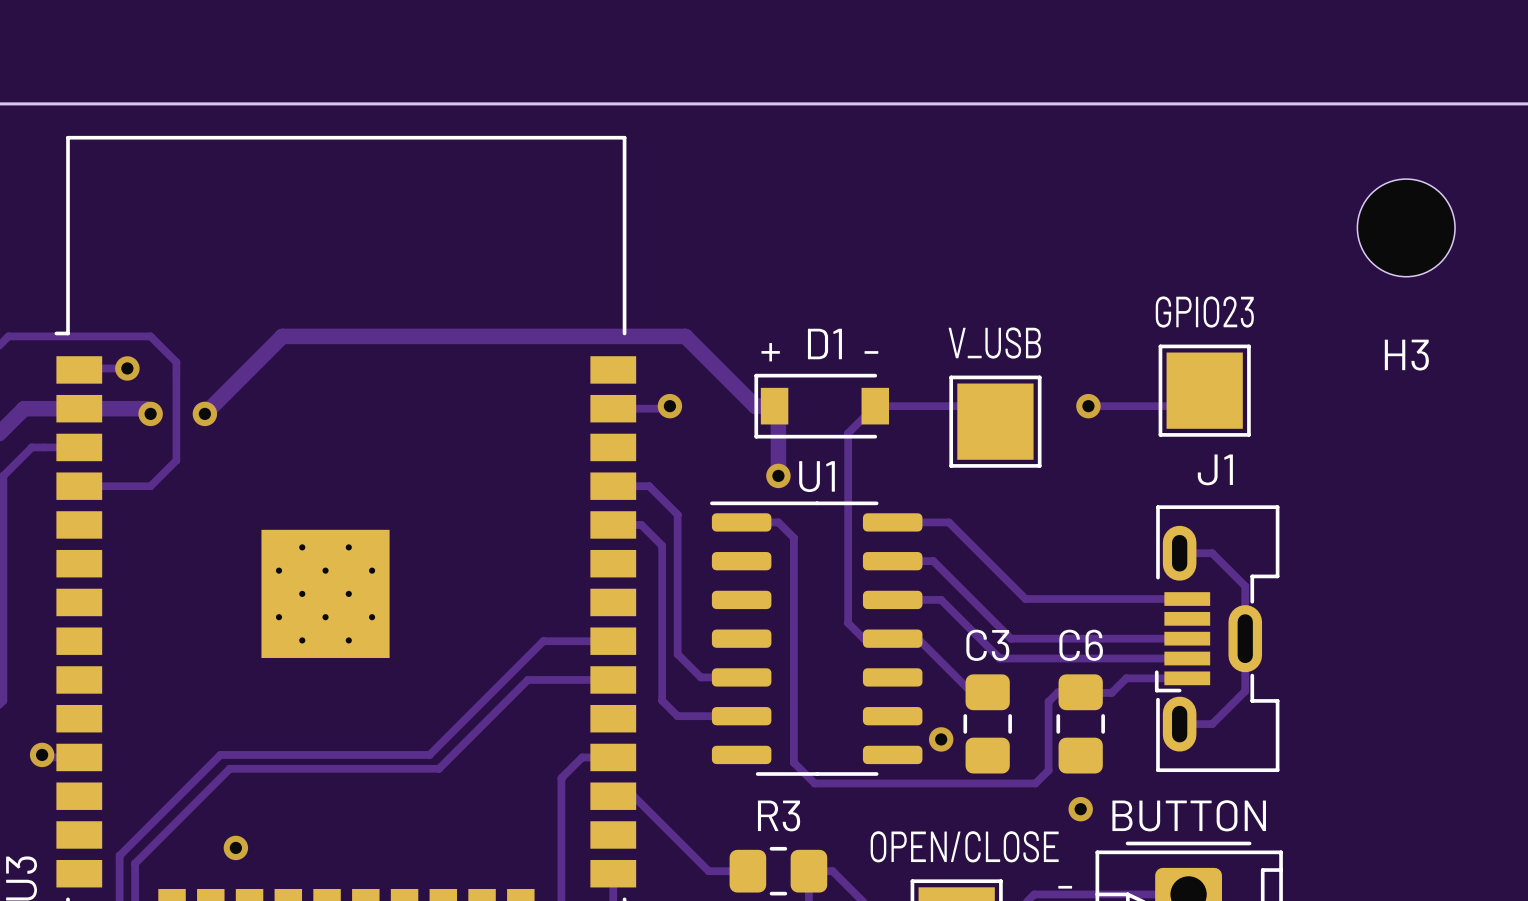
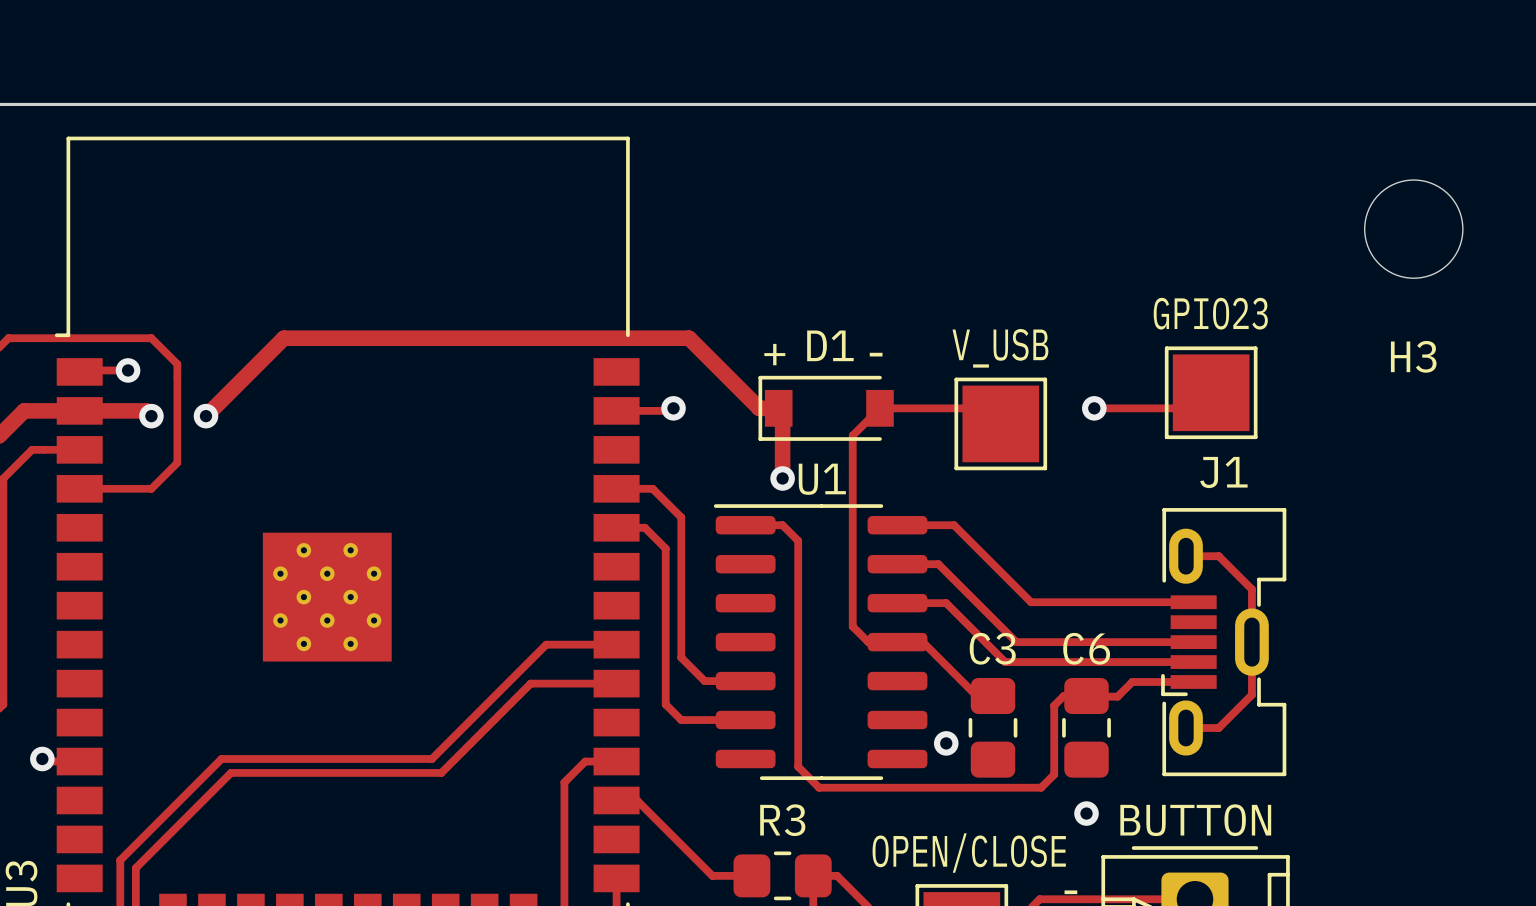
via: (235, 847) -> none

